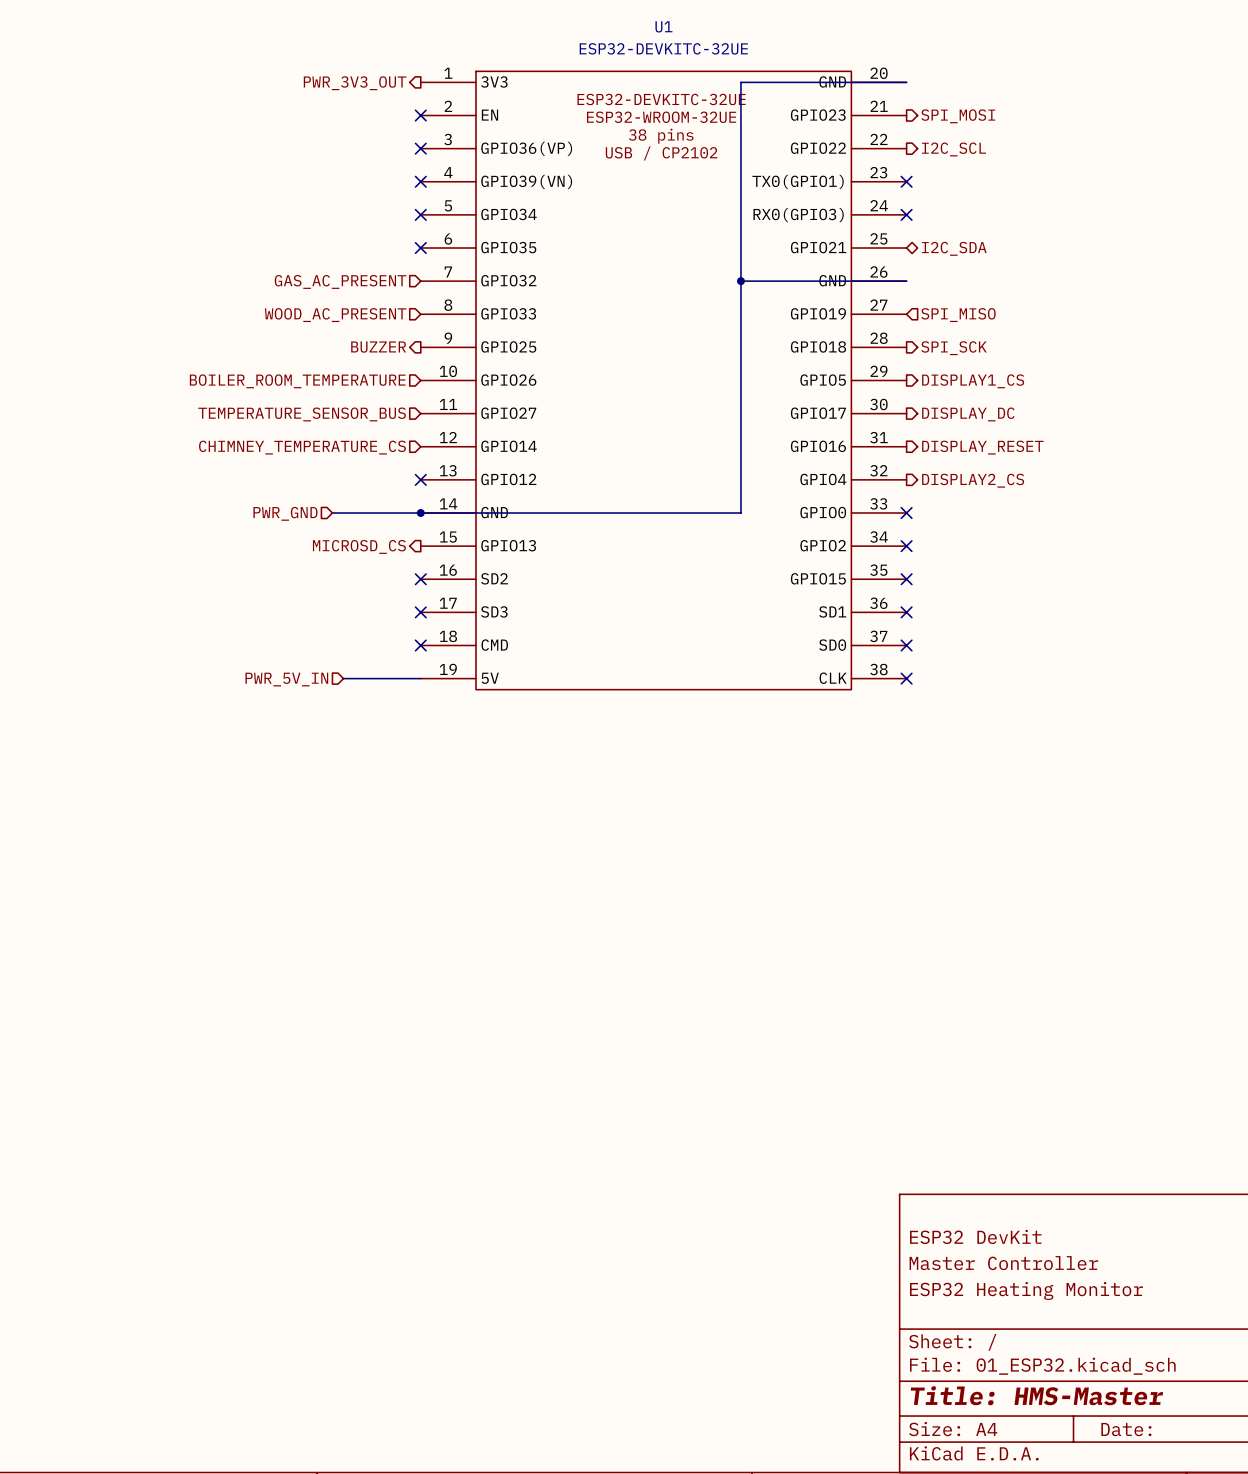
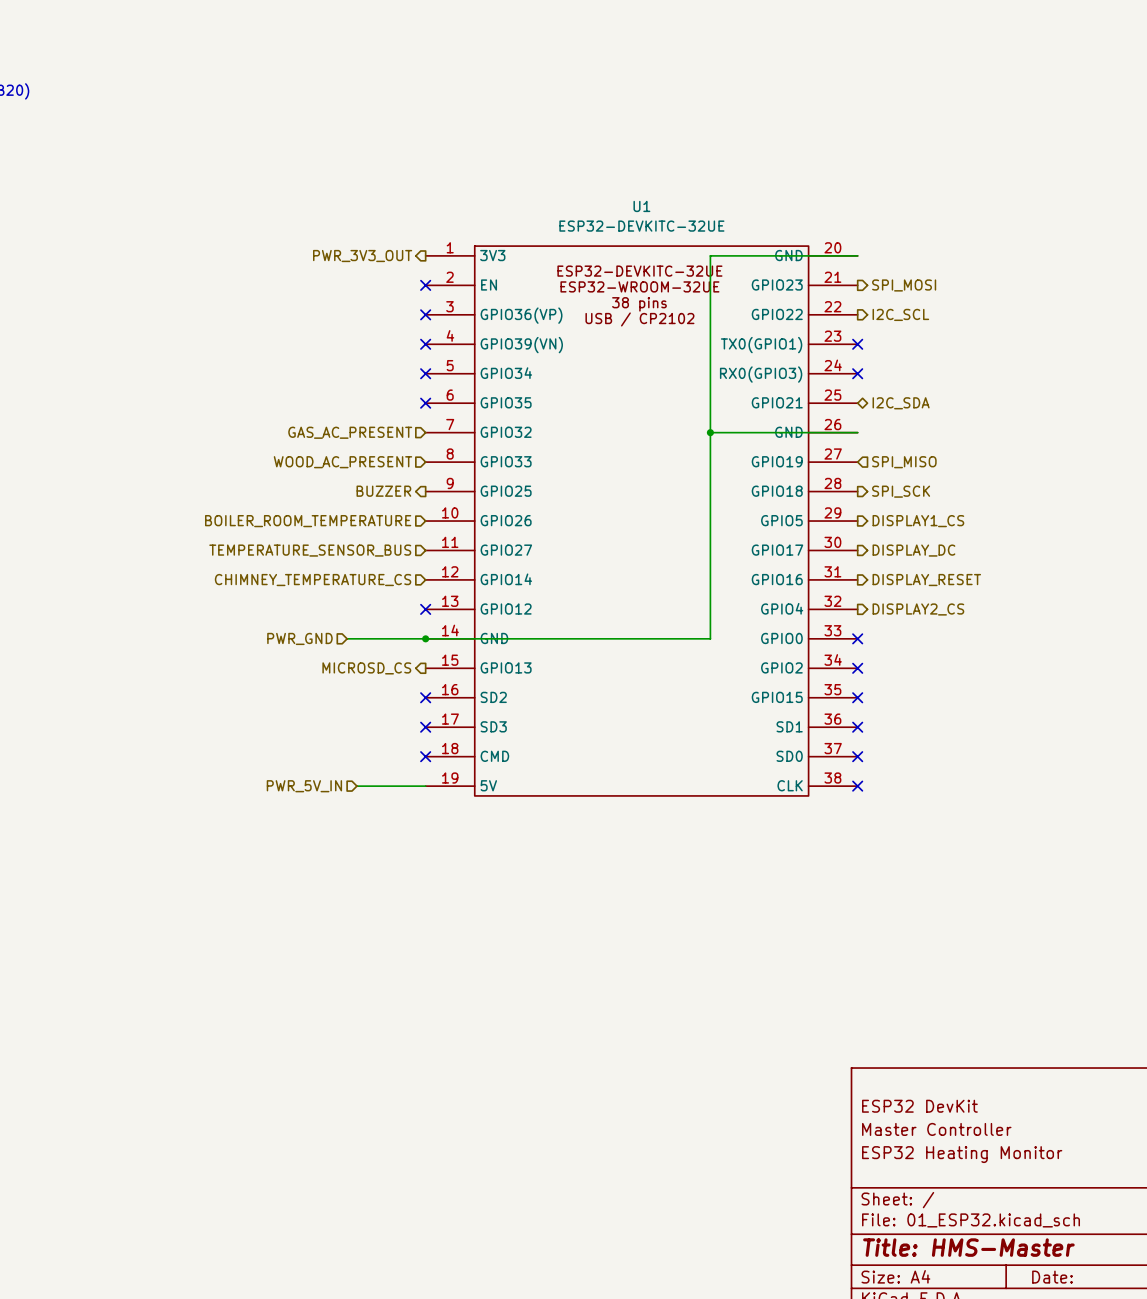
wire: (906, 82) (740, 82) (740, 281) -> none
hierarchical label: PWR_3V3_OUT (355, 83) -> none
no-connect mark: (420, 115) -> none
hierarchical label: SPI_MOSI (958, 116) -> none
no-connect mark: (420, 148) -> none
hierarchical label: I2C_SCL (953, 149) -> none
no-connect mark: (420, 181) -> none
no-connect mark: (906, 181) -> none
no-connect mark: (420, 214) -> none
no-connect mark: (906, 214) -> none
no-connect mark: (420, 248) -> none
hierarchical label: I2C_SDA (954, 248) -> none
hierarchical label shape: input (340, 281) -> output (362, 256)
hierarchical label: GAS_AC_PRESENT (340, 281) -> PWR_3V3_OUT (362, 256)
junction: (740, 281) -> none
no-connect mark: none -> (425, 285)
hierarchical label position: WOOD_AC_PRESENT (335, 315) -> WOOD_AC_PRESENT (342, 462)
hierarchical label shape: input (958, 315) -> output (904, 285)
hierarchical label: SPI_MISO (958, 315) -> SPI_MOSI (904, 285)
hierarchical label: BUZZER (378, 347) -> none
no-connect mark: none -> (425, 314)
hierarchical label: SPI_SCK (954, 348) -> I2C_SCL (900, 314)
no-connect mark: none -> (425, 344)
U1 position: (663, 380) -> (641, 521)
no-connect mark: none -> (857, 344)
hierarchical label position: BOILER_ROOM_TEMPERATURE (297, 381) -> BOILER_ROOM_TEMPERATURE (308, 521)
hierarchical label position: DISPLAY1_CS (973, 381) -> DISPLAY1_CS (918, 521)
no-connect mark: none -> (425, 373)
no-connect mark: none -> (857, 373)
hierarchical label position: TEMPERATURE_SENSOR_BUS (302, 414) -> TEMPERATURE_SENSOR_BUS (310, 550)
hierarchical label position: DISPLAY_DC (968, 414) -> DISPLAY_DC (913, 550)
no-connect mark: none -> (425, 403)
hierarchical label position: CHIMNEY_TEMPERATURE_CS (302, 447) -> CHIMNEY_TEMPERATURE_CS (313, 580)
hierarchical label shape: output (982, 447) -> bidirectional (901, 403)
hierarchical label: DISPLAY_RESET (982, 447) -> I2C_SDA (901, 403)
no-connect mark: (420, 479) -> none
wire: none -> (710, 432) (857, 432)
junction: none -> (710, 432)
hierarchical label: none -> GAS_AC_PRESENT (350, 432)
hierarchical label position: DISPLAY2_CS (973, 480) -> DISPLAY2_CS (918, 609)
wire: (332, 512) (740, 512) -> (347, 638) (710, 638) (710, 462)
junction: (420, 512) -> none
no-connect mark: (906, 512) -> none
hierarchical label position: PWR_GND (285, 513) -> PWR_GND (299, 638)
hierarchical label: none -> SPI_MISO (904, 462)
hierarchical label: MICROSD_CS (359, 546) -> BUZZER (383, 491)
no-connect mark: (906, 546) -> none
hierarchical label: none -> SPI_SCK (901, 491)
no-connect mark: (420, 579) -> none
no-connect mark: (906, 579) -> none
no-connect mark: (420, 612) -> none
no-connect mark: (906, 612) -> none
no-connect mark: (420, 645) -> none
no-connect mark: (906, 645) -> none
hierarchical label: none -> DISPLAY_RESET (926, 580)
wire: (343, 678) (420, 678) -> (356, 786) (425, 786)
no-connect mark: none -> (425, 609)
no-connect mark: (906, 678) -> none
hierarchical label position: PWR_5V_IN (286, 679) -> PWR_5V_IN (304, 786)
junction: none -> (425, 638)
no-connect mark: none -> (857, 638)
no-connect mark: none -> (857, 668)
hierarchical label: none -> MICROSD_CS (366, 668)
no-connect mark: none -> (425, 697)
no-connect mark: none -> (857, 697)
no-connect mark: none -> (425, 727)
no-connect mark: none -> (857, 727)
no-connect mark: none -> (425, 756)
no-connect mark: none -> (857, 756)
no-connect mark: none -> (857, 786)

